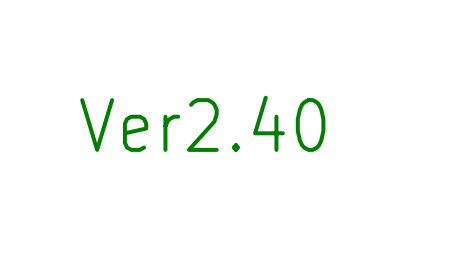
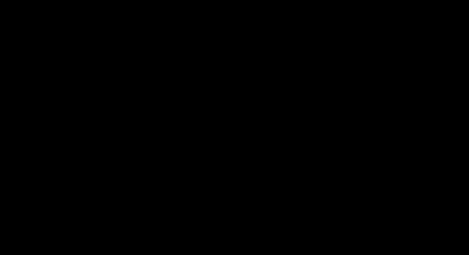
text: Ver2.40 (202, 123) -> none

